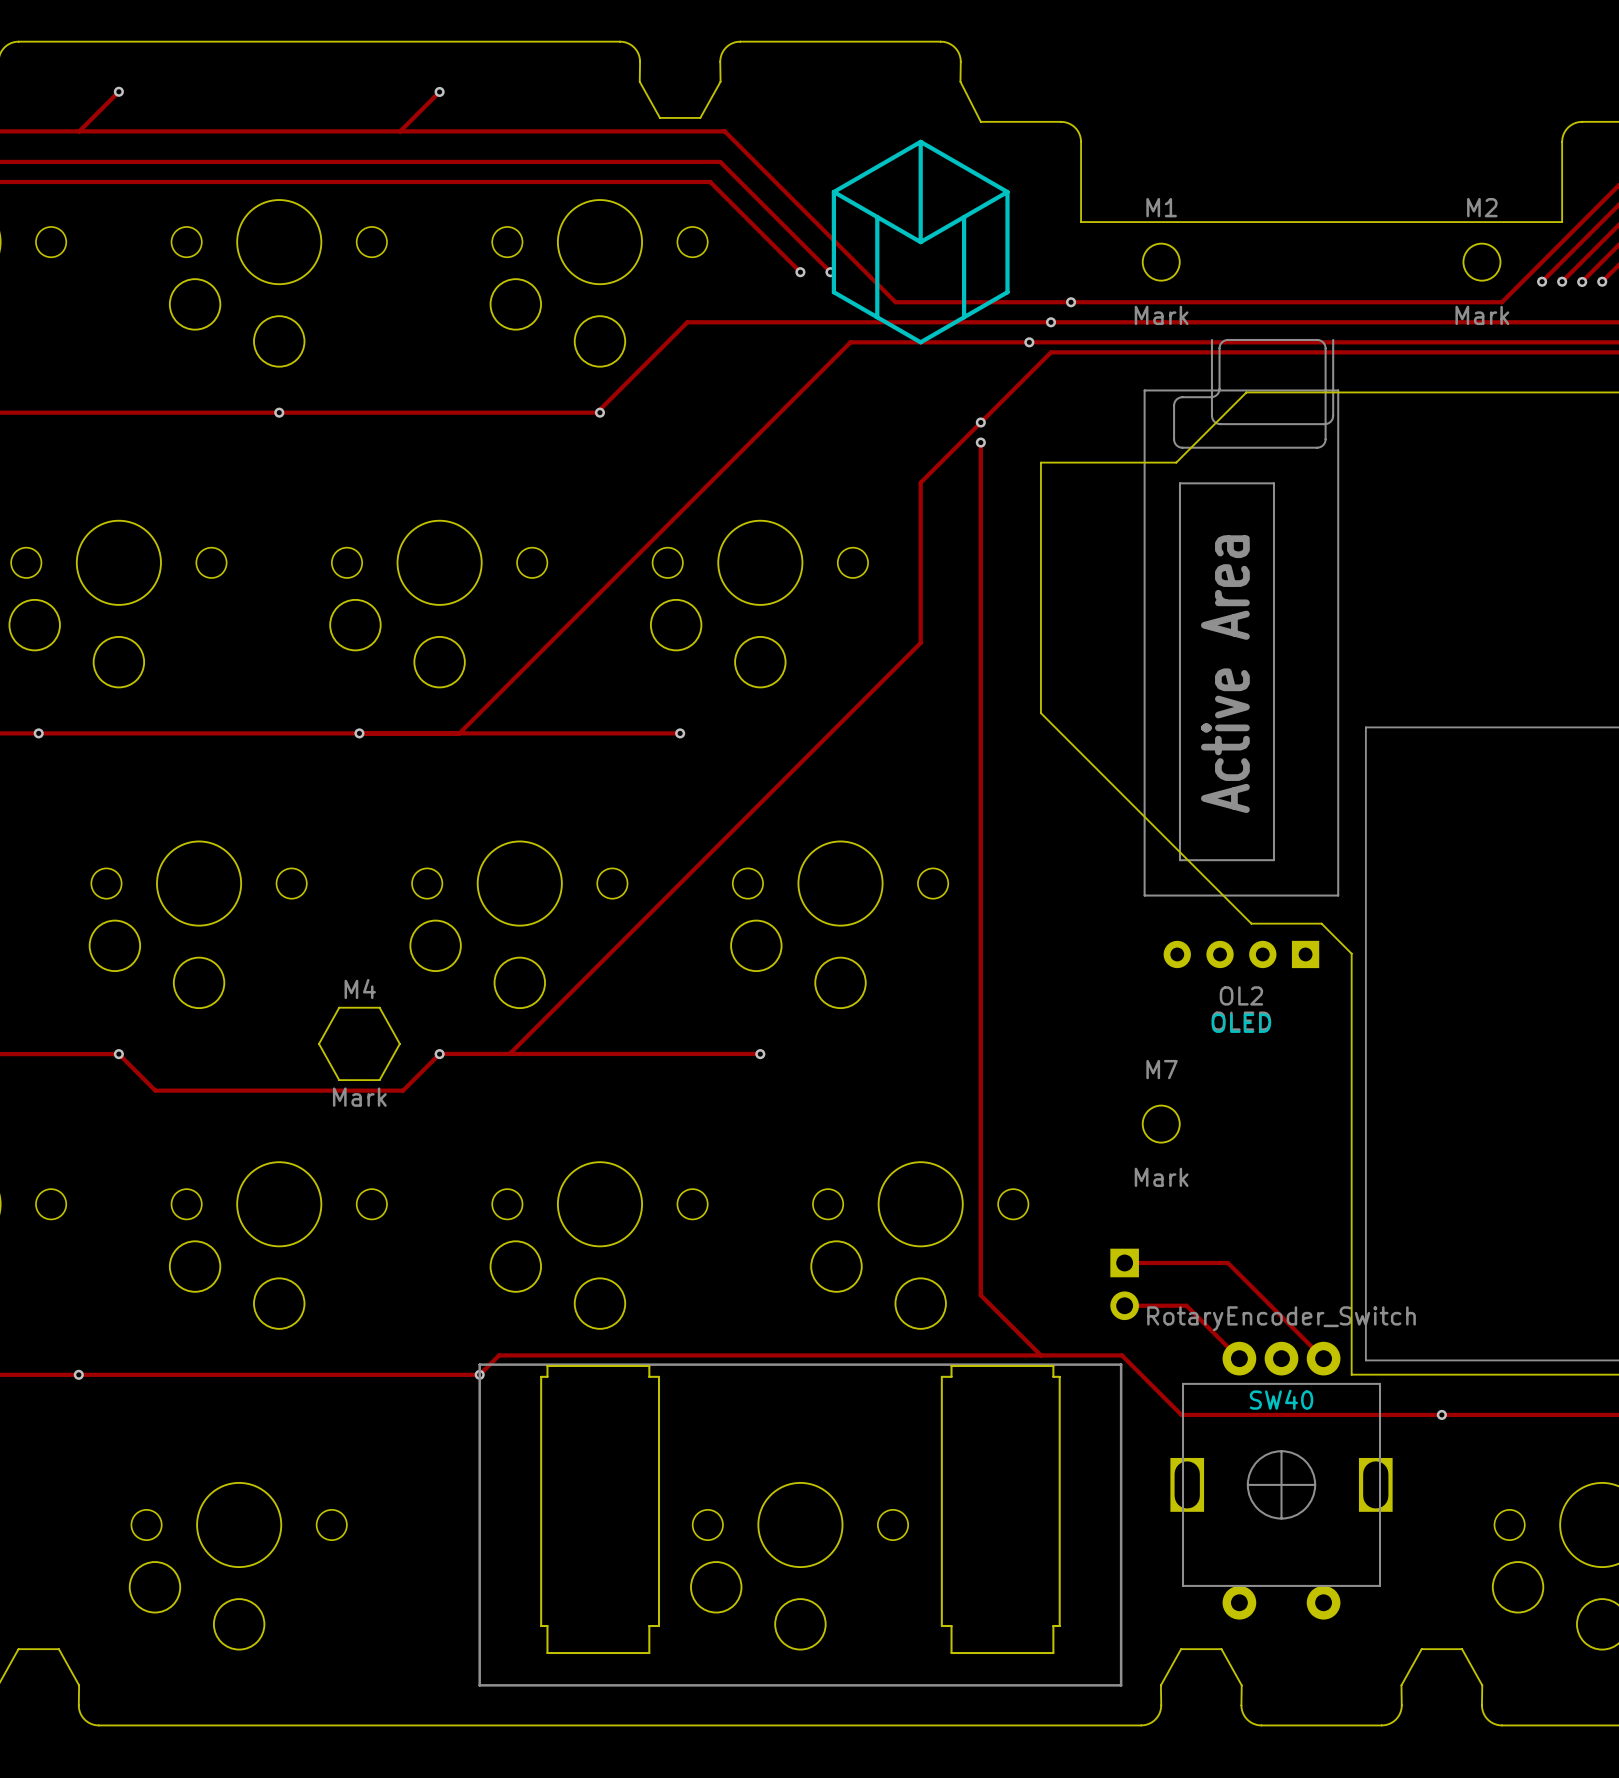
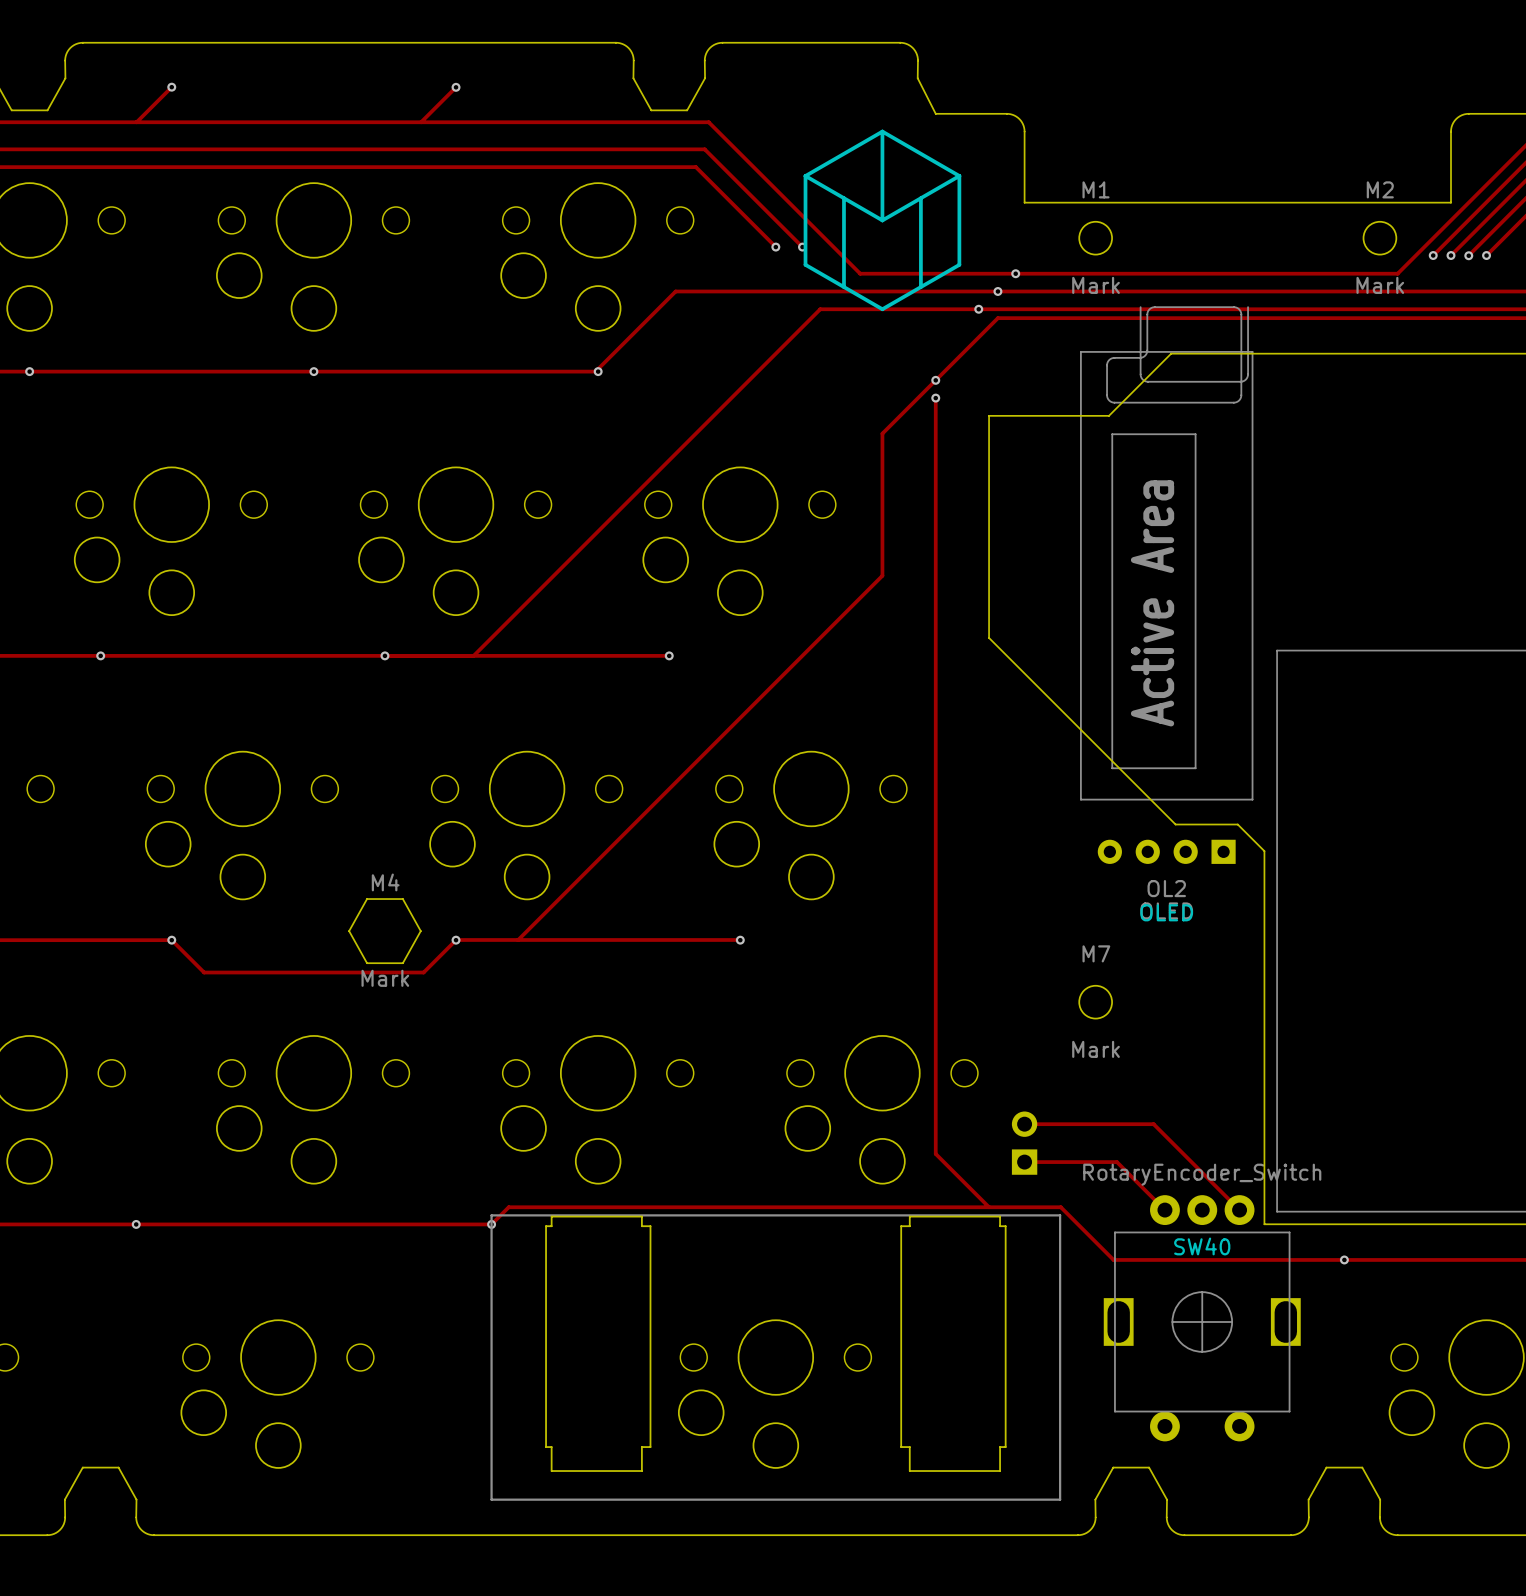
track: (1124, 1262) (1227, 1262) -> (1024, 1124) (1154, 1125)
part rotation: 0° (1124, 1284) -> 180° (1024, 1143)
part position: (1124, 1284) -> (1024, 1143)
track: (1124, 1305) (1186, 1305) -> (1024, 1162) (1118, 1163)

